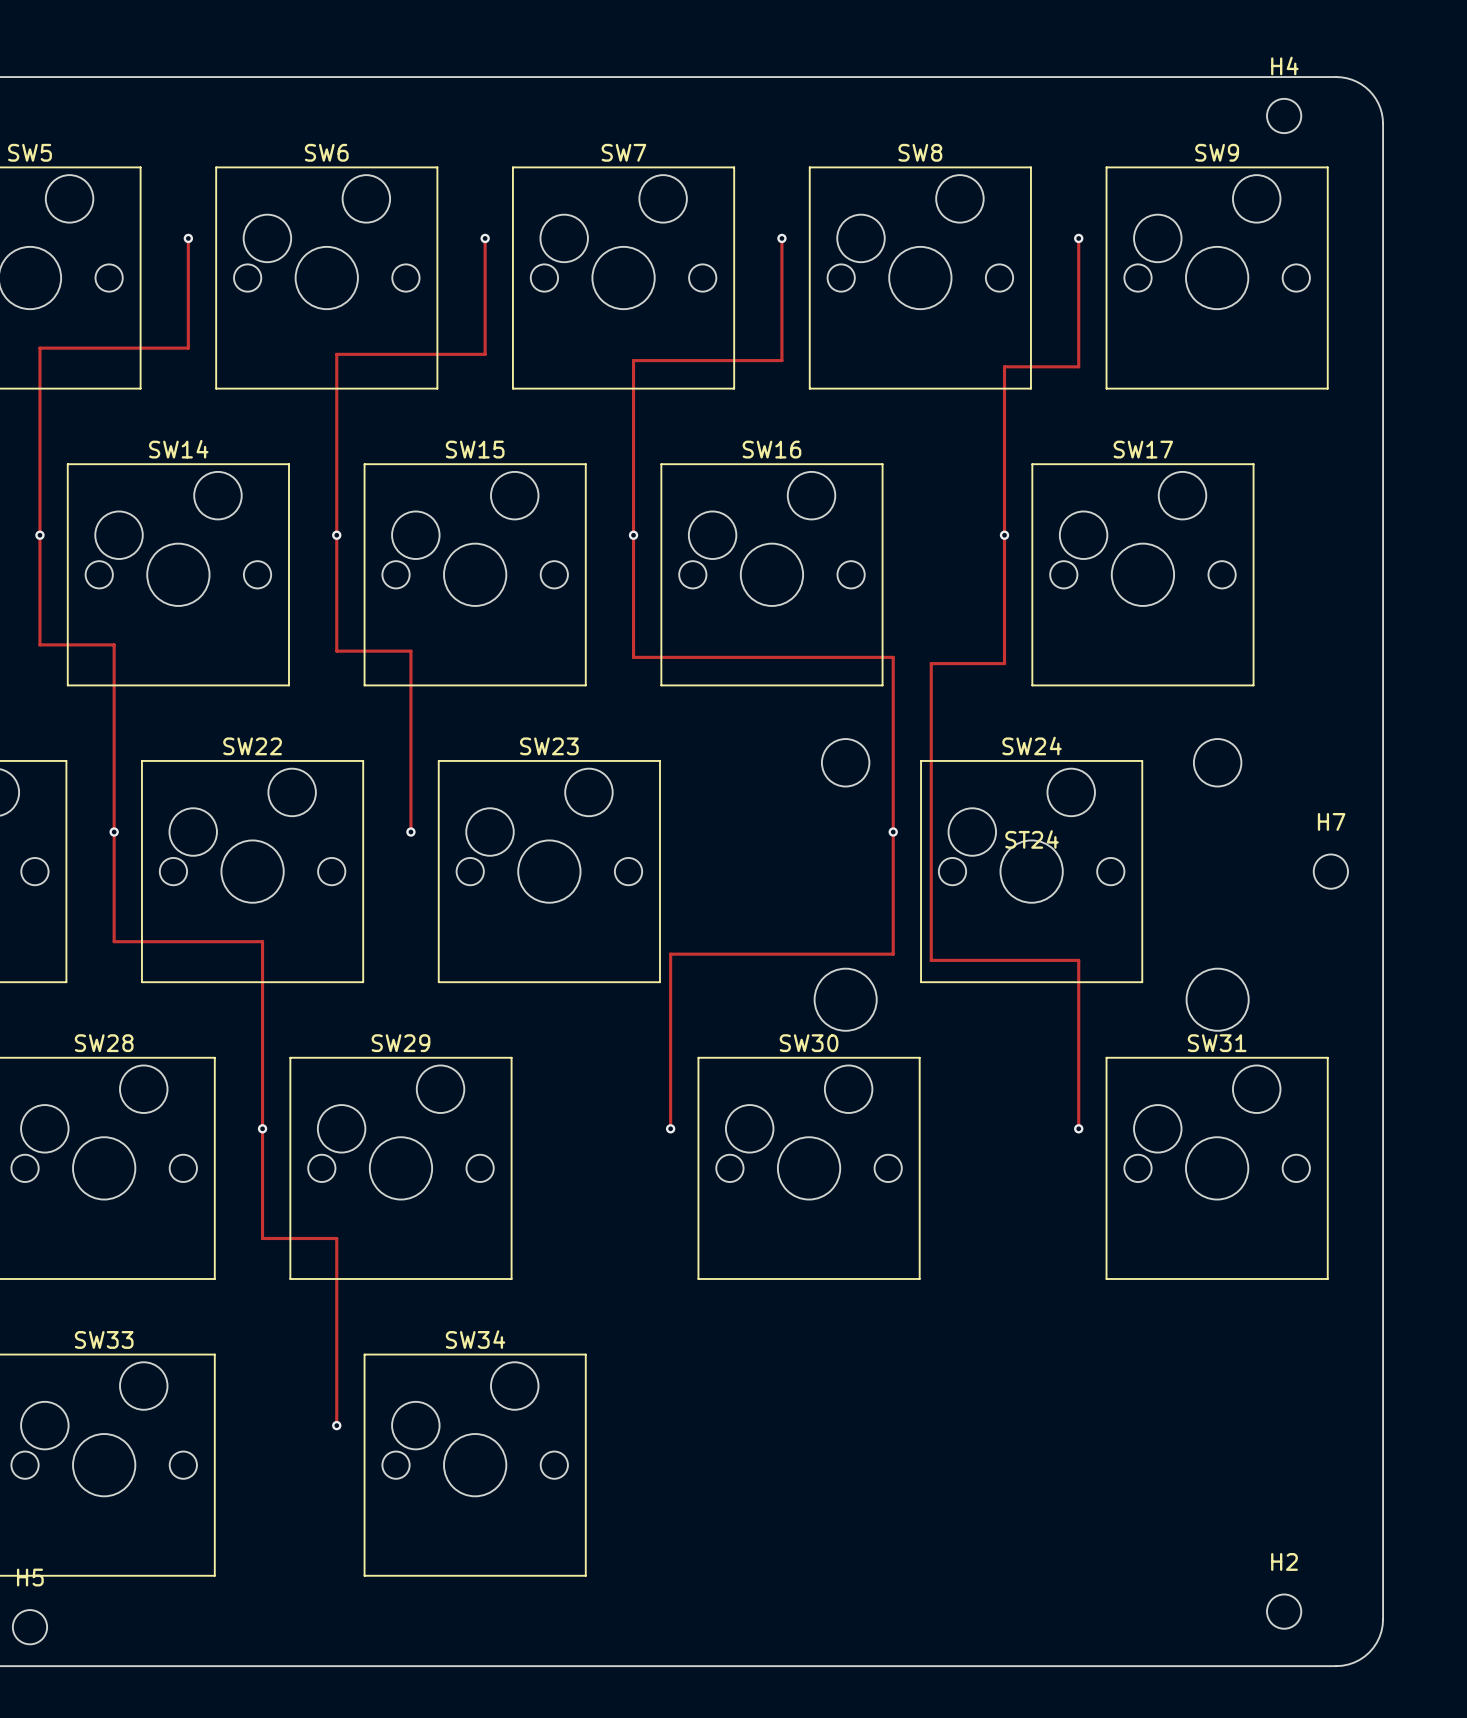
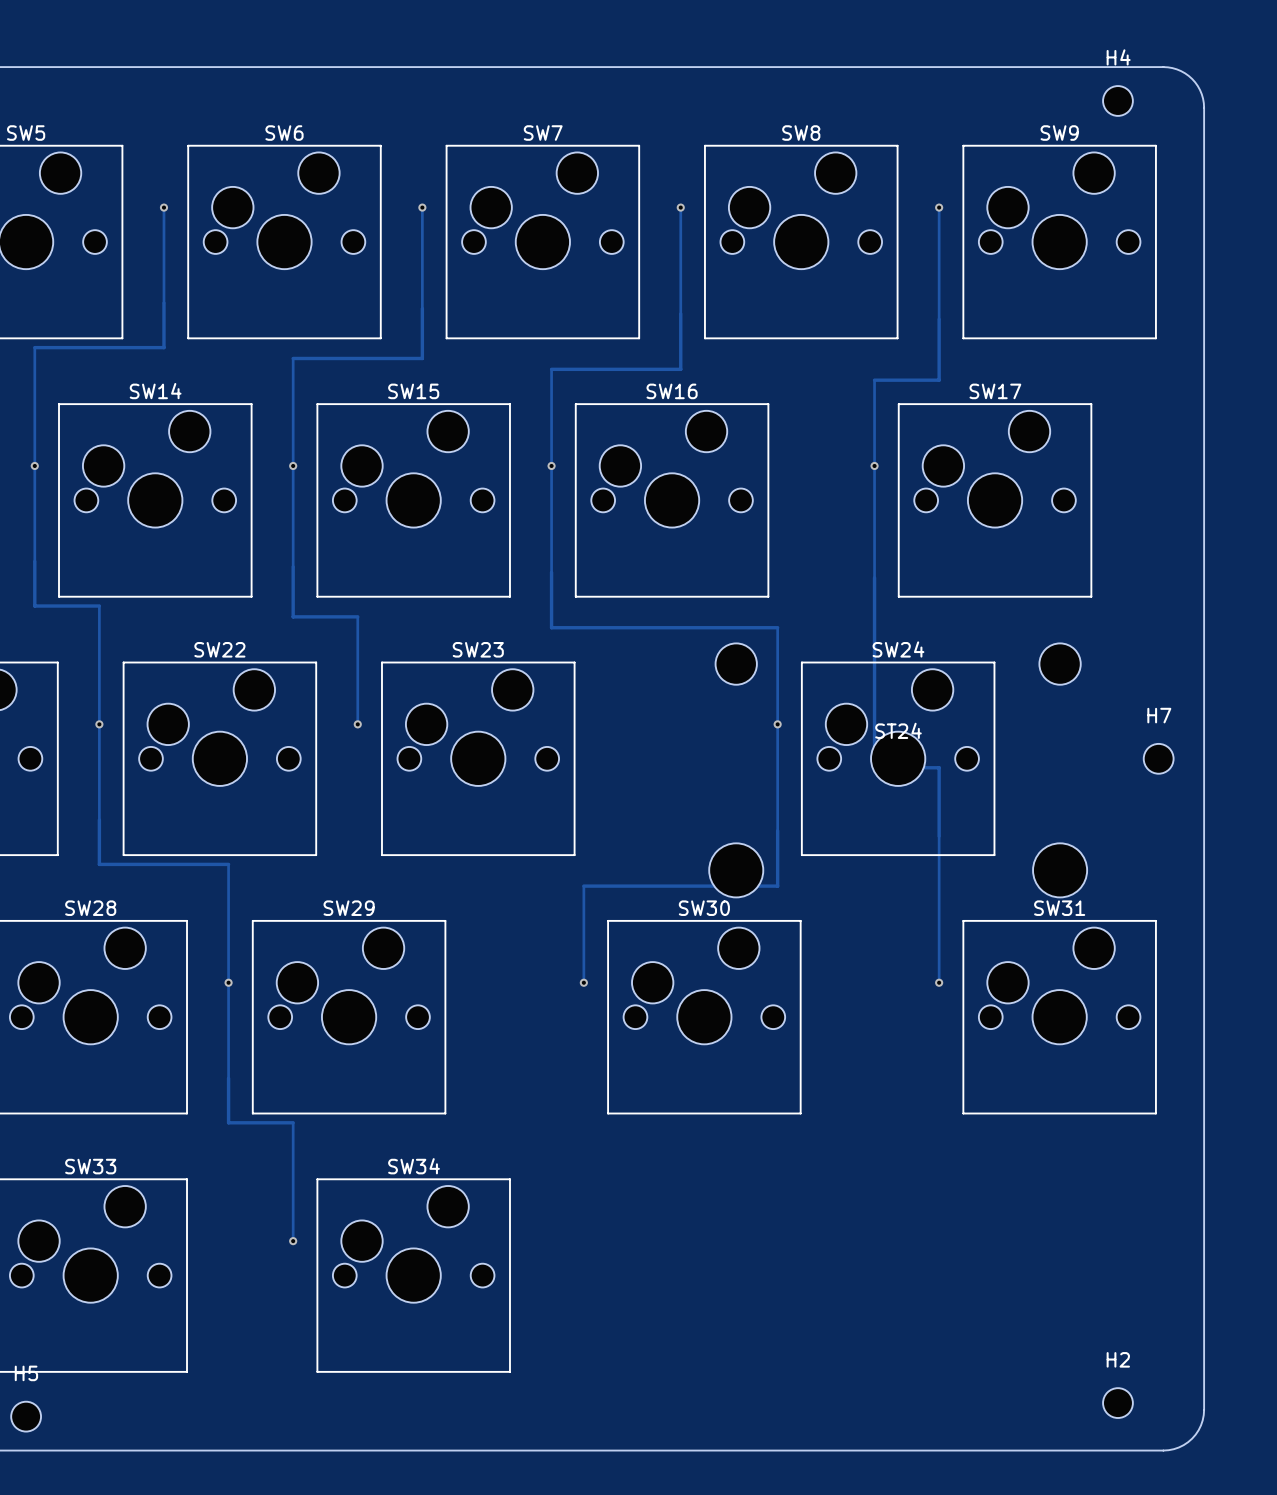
track: (188, 348) (39, 348) (39, 399) -> (163, 303) (163, 347) (34, 347)
track: (485, 354) (336, 354) (336, 411) -> (422, 308) (422, 358) (293, 358)
track: (781, 360) (633, 360) (633, 424) -> (680, 313) (680, 369) (551, 369)
track: (1078, 366) (1004, 366) (1004, 436) -> (939, 319) (939, 380) (874, 380)
track: (39, 644) (114, 644) (114, 696) -> (34, 561) (34, 606) (99, 606)
track: (336, 651) (410, 651) (410, 708) -> (293, 566) (293, 616) (357, 616)
track: (633, 657) (893, 657) (893, 721) -> (551, 572) (551, 627) (777, 627)
track: (1004, 663) (931, 663) (931, 960) (1078, 960) -> (874, 577) (874, 767) (939, 767) (939, 836)
track: (114, 941) (262, 941) (262, 992) -> (99, 819) (99, 864) (228, 864)
track: (893, 954) (670, 954) (670, 1017) -> (777, 830) (777, 886) (583, 886)
track: (262, 1238) (336, 1238) (336, 1289) -> (228, 1078) (228, 1122) (293, 1122)

